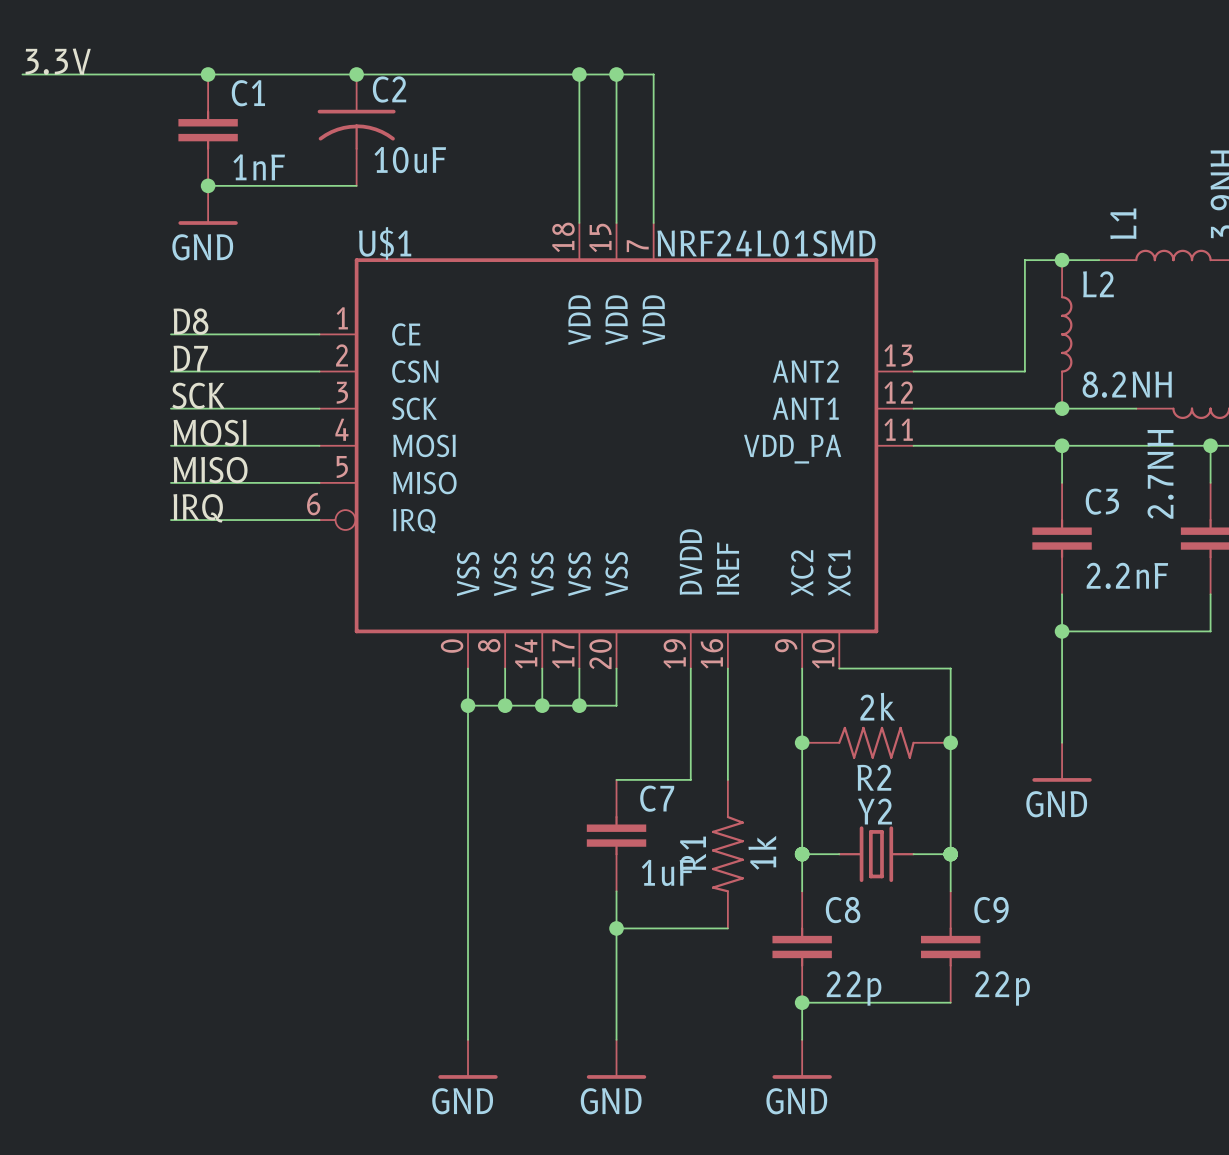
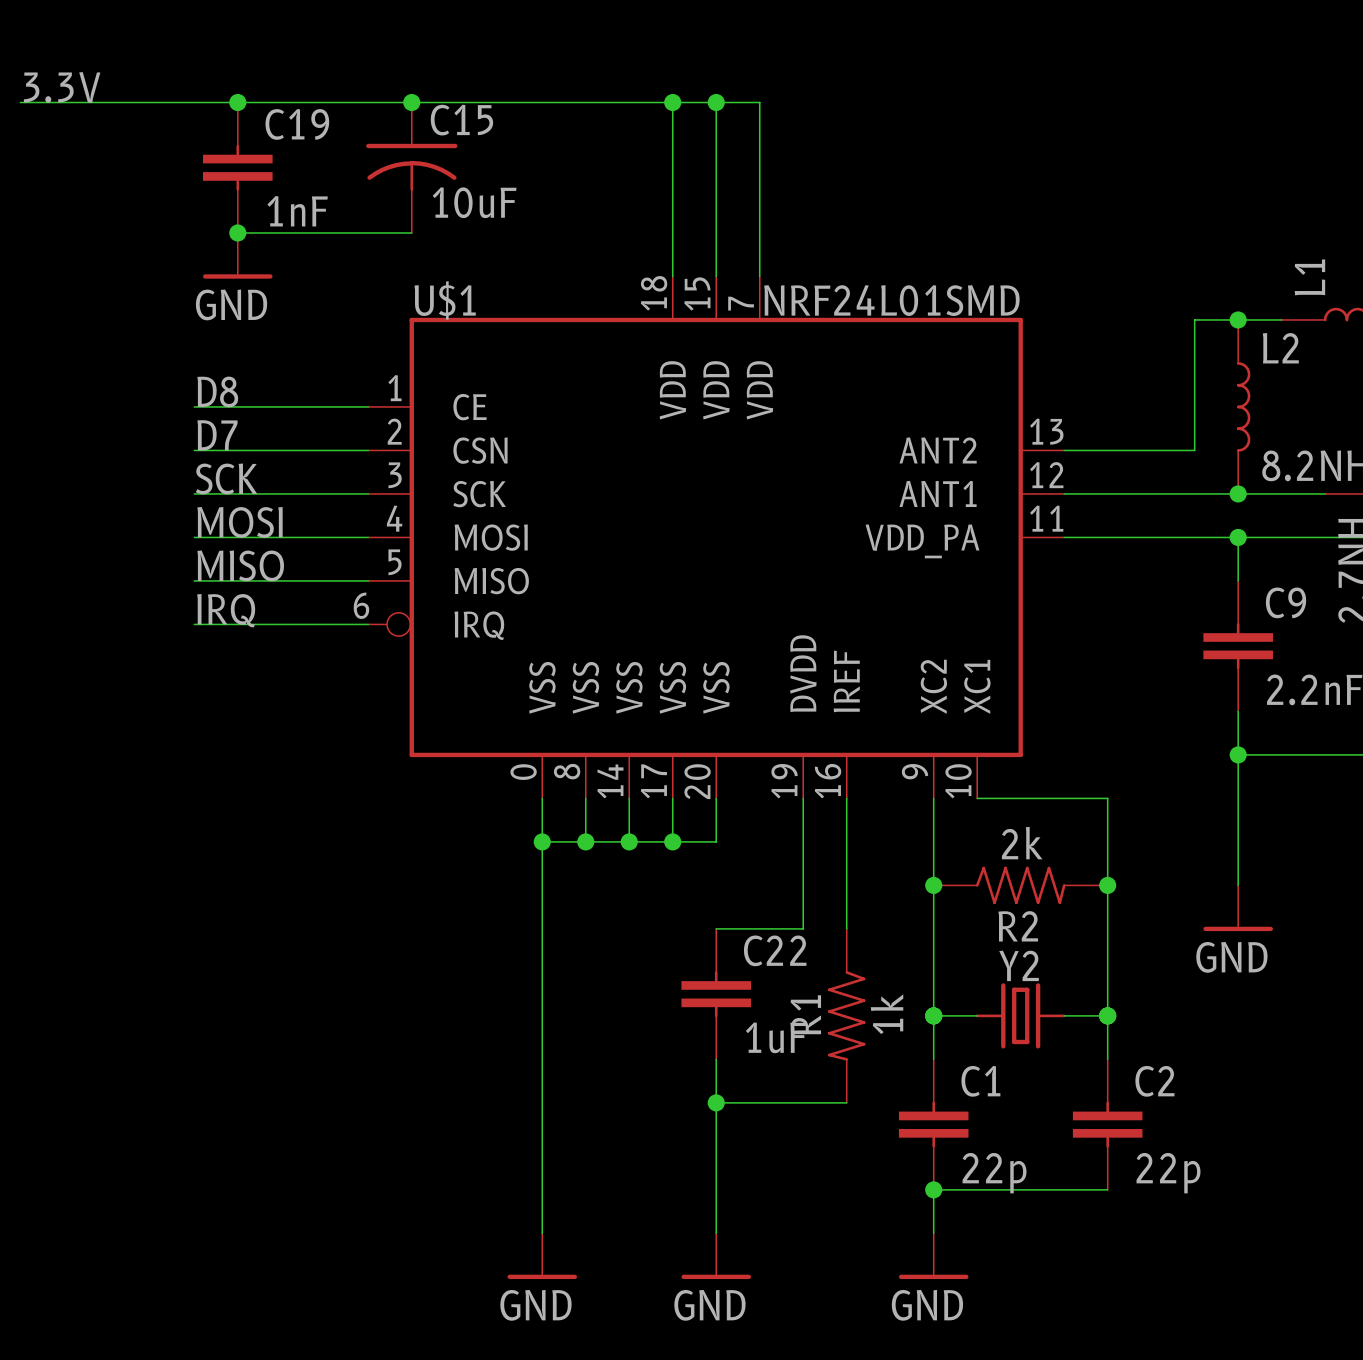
C2 name: C2 (389, 89) -> C15 (461, 120)
C1 name: C1 (248, 93) -> C19 (297, 124)
C3 name: C3 (1102, 501) -> C9 (1286, 602)
C7 name: C7 (657, 798) -> C22 (775, 950)
C8 name: C8 (843, 910) -> C1 (980, 1081)
C9 name: C9 (991, 910) -> C2 (1154, 1081)

